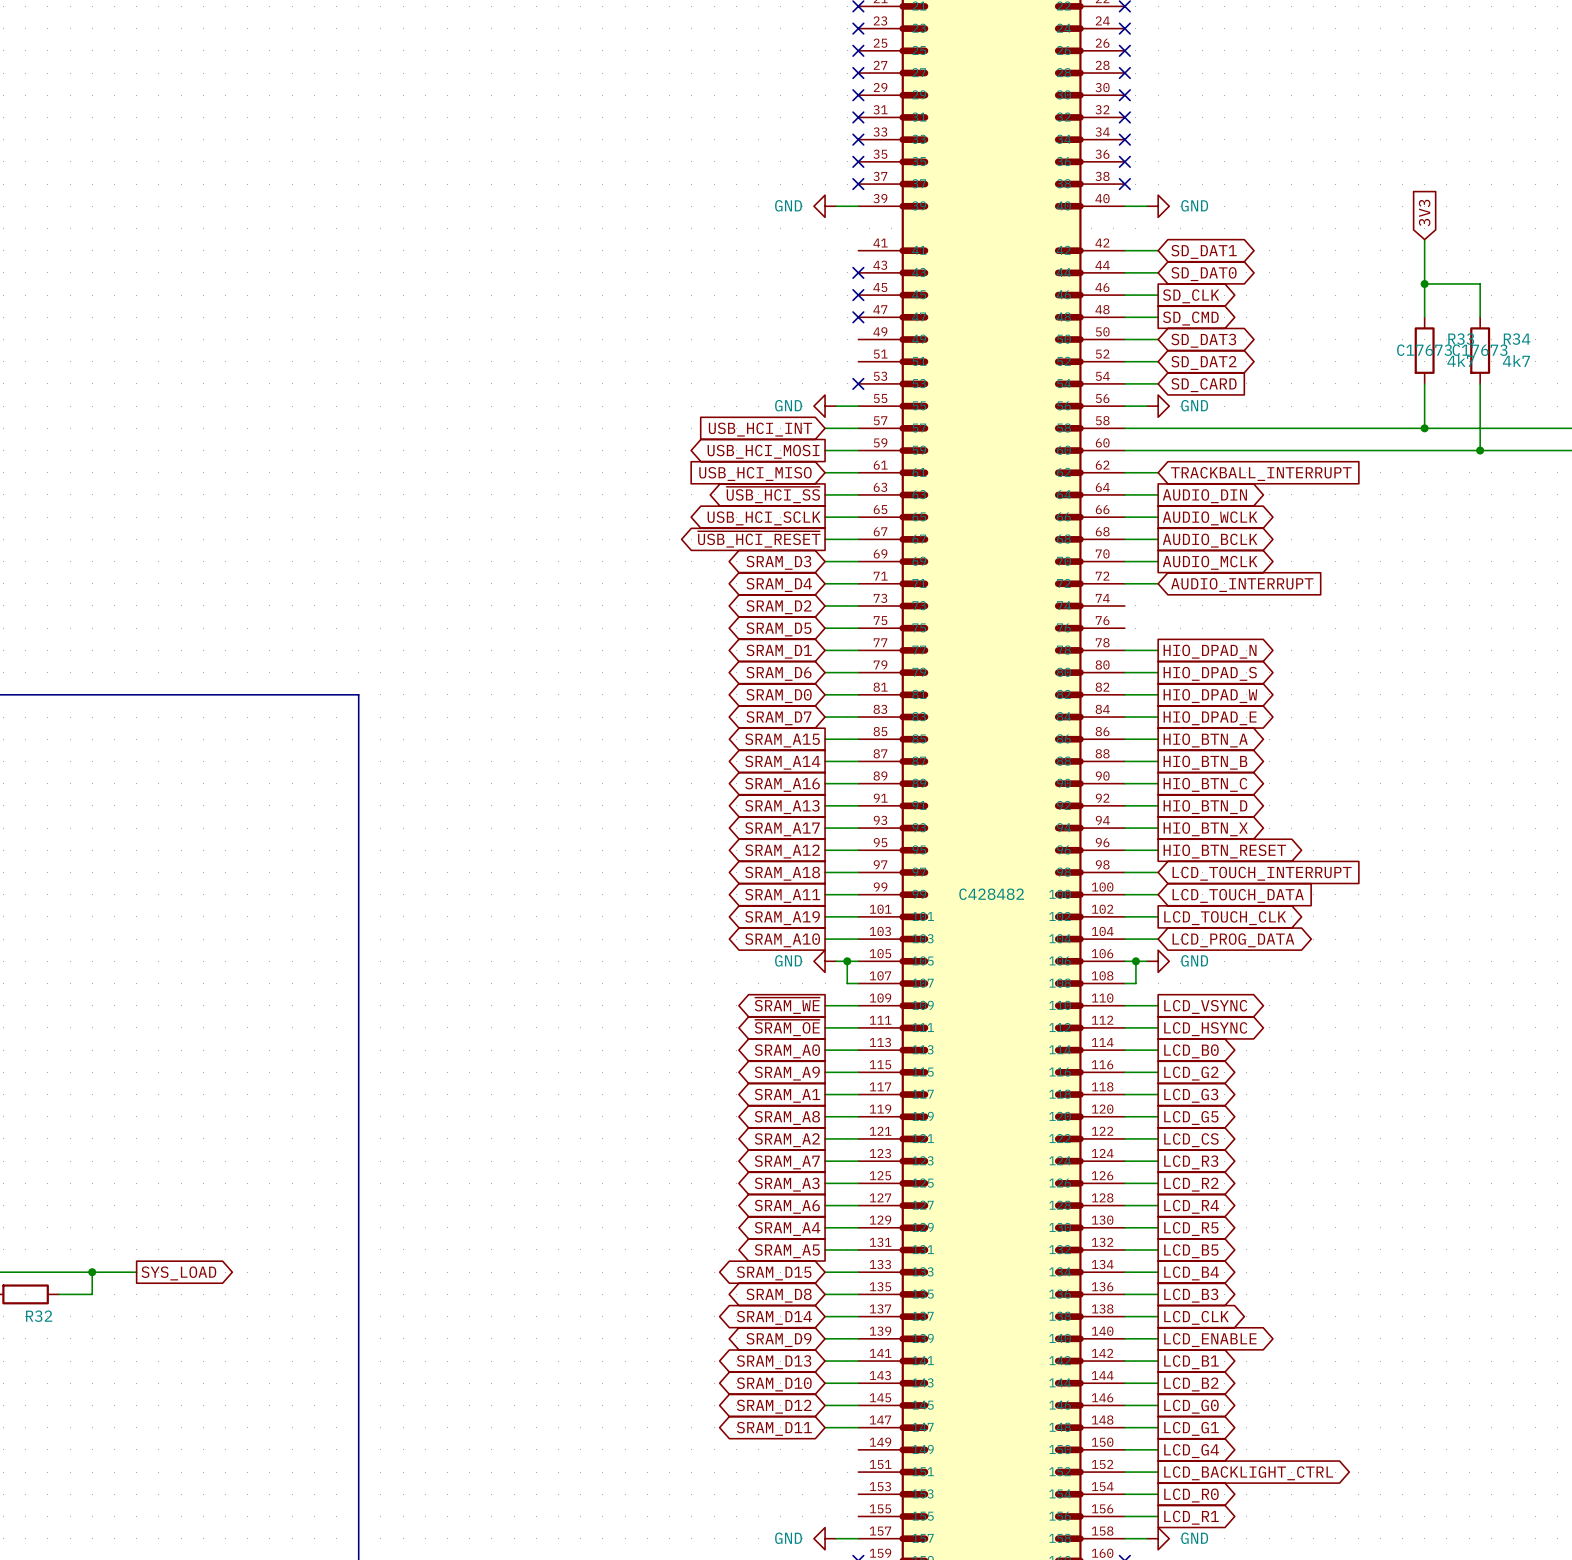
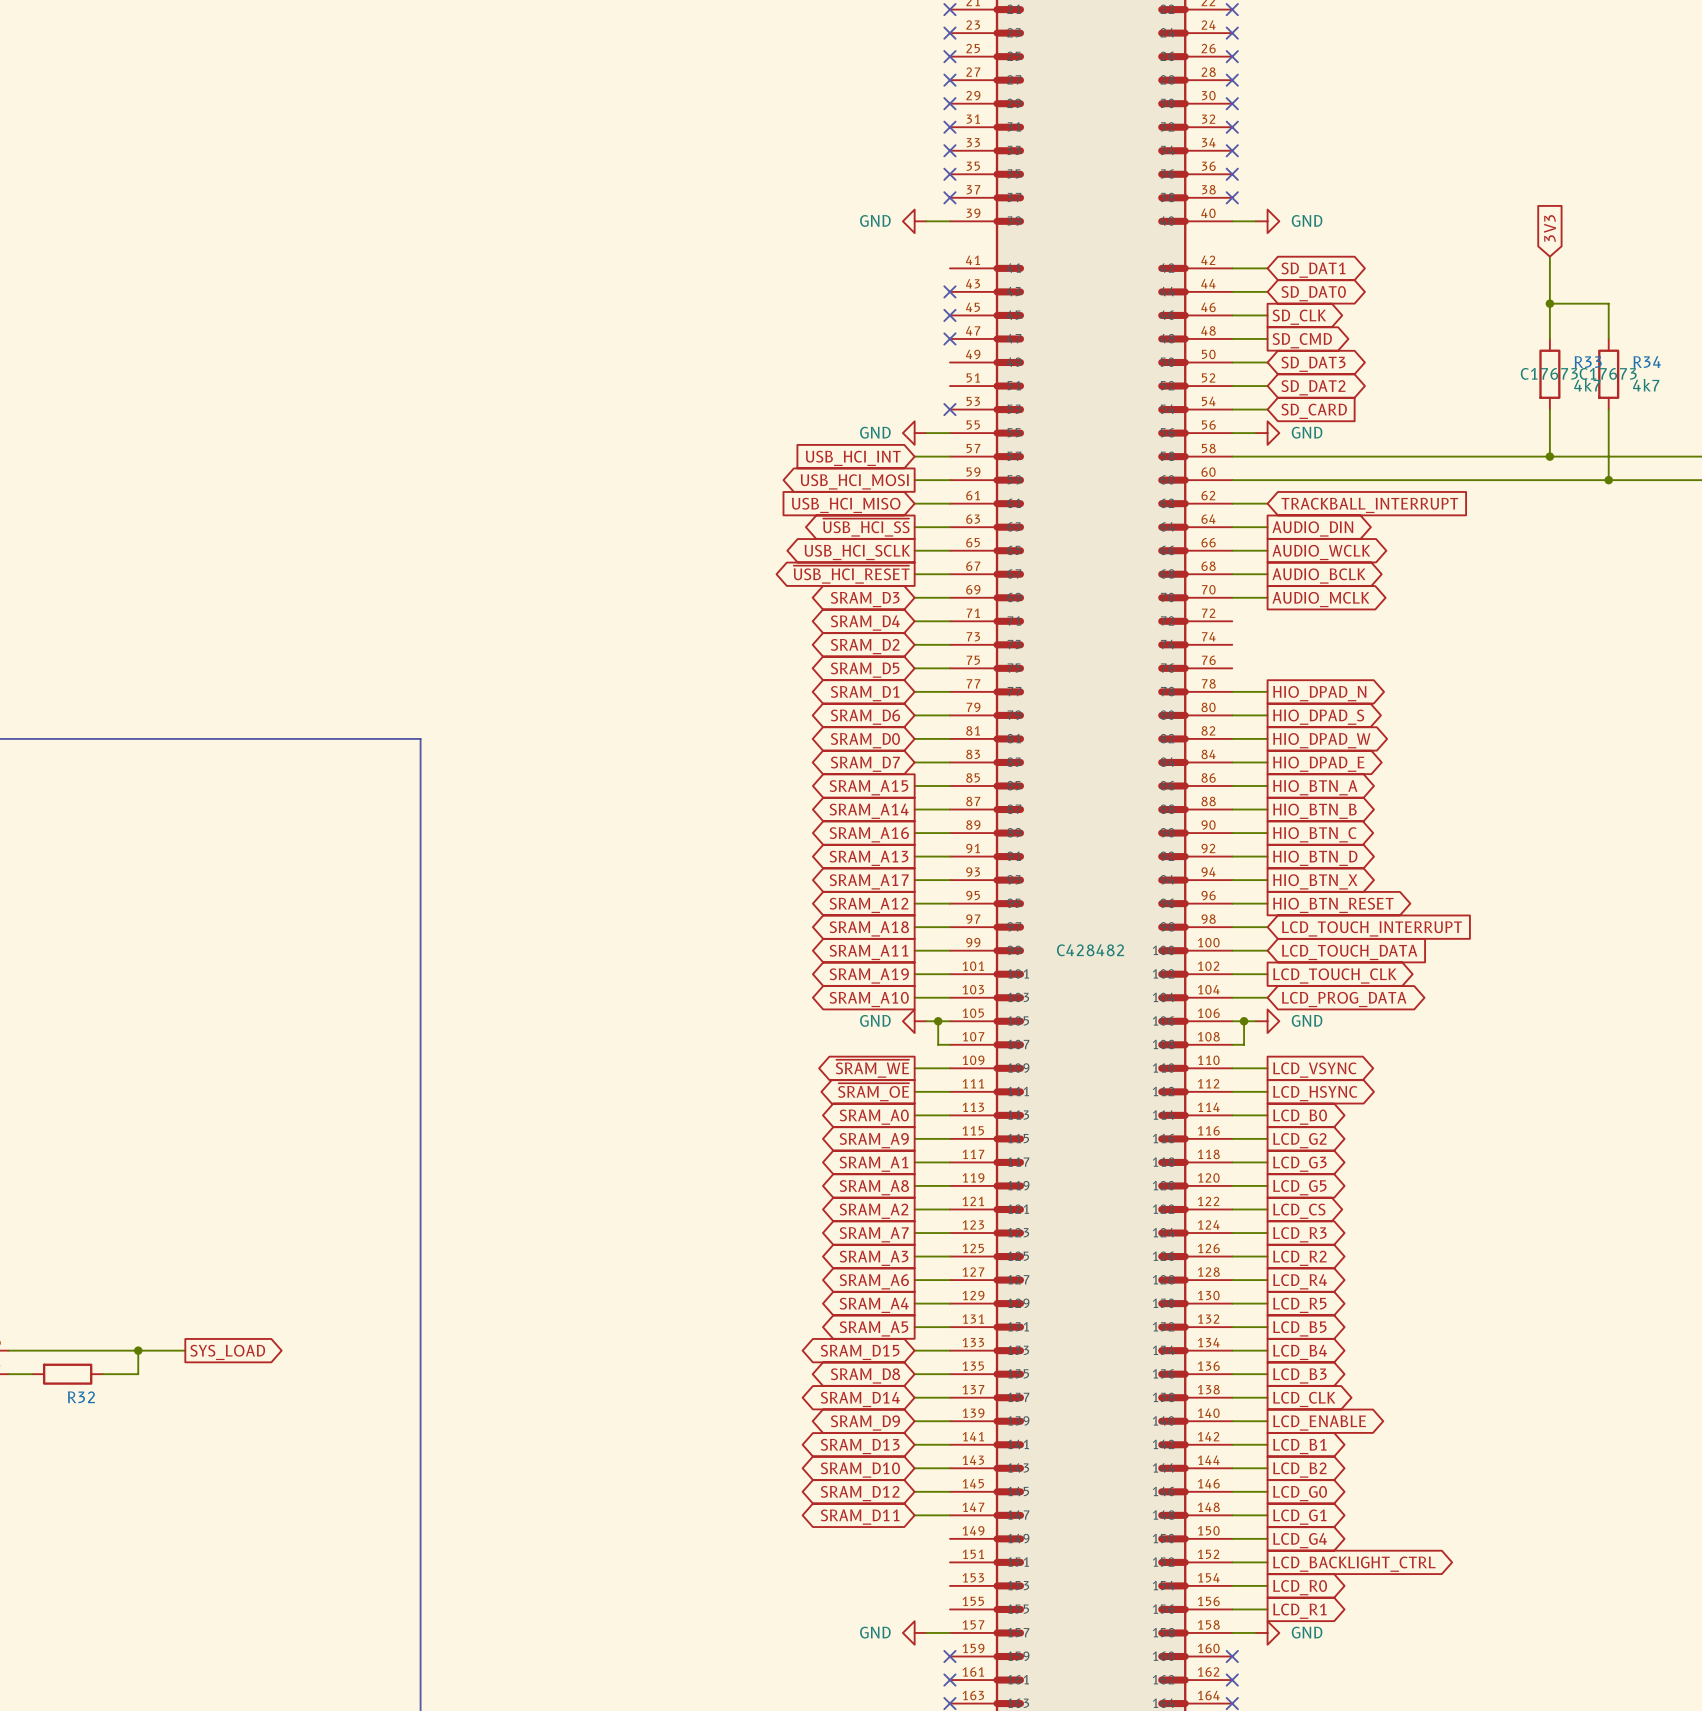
wire: (1124, 583) (1158, 583) -> none
global label: AUDIO_INTERRUPT (1242, 585) -> none

